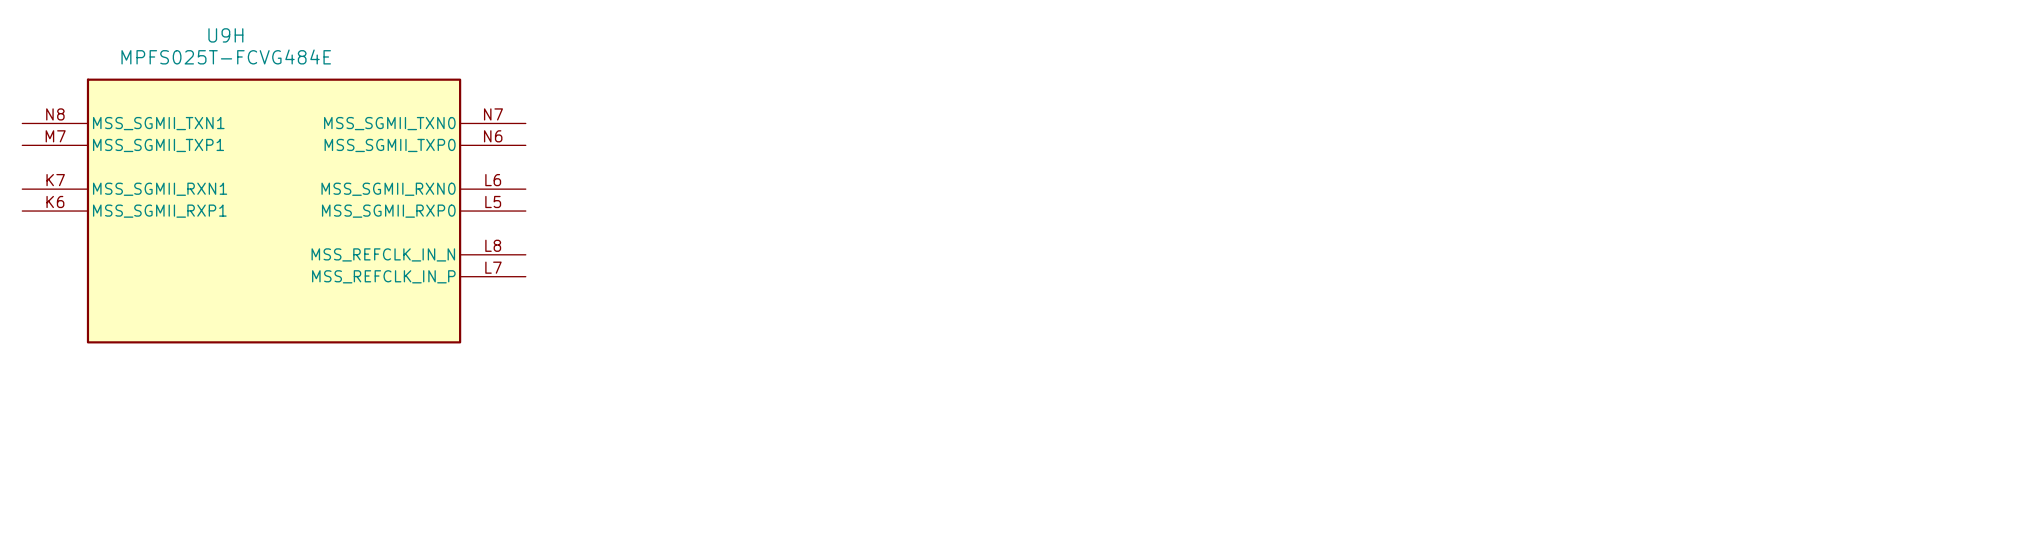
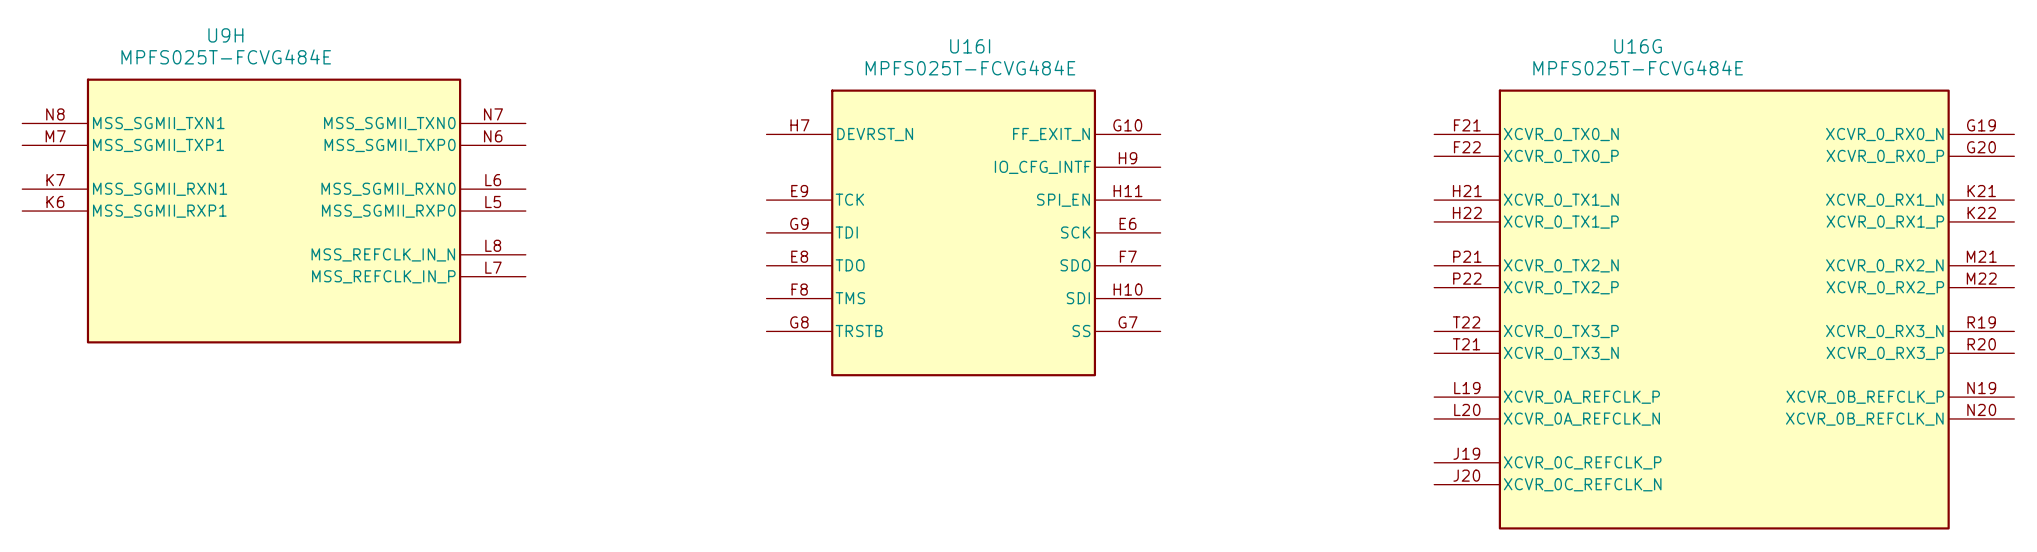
U16I: none -> MPFS025T-FCVG484E (963, 232)
U16G: none -> MPFS025T-FCVG484E (1724, 309)

